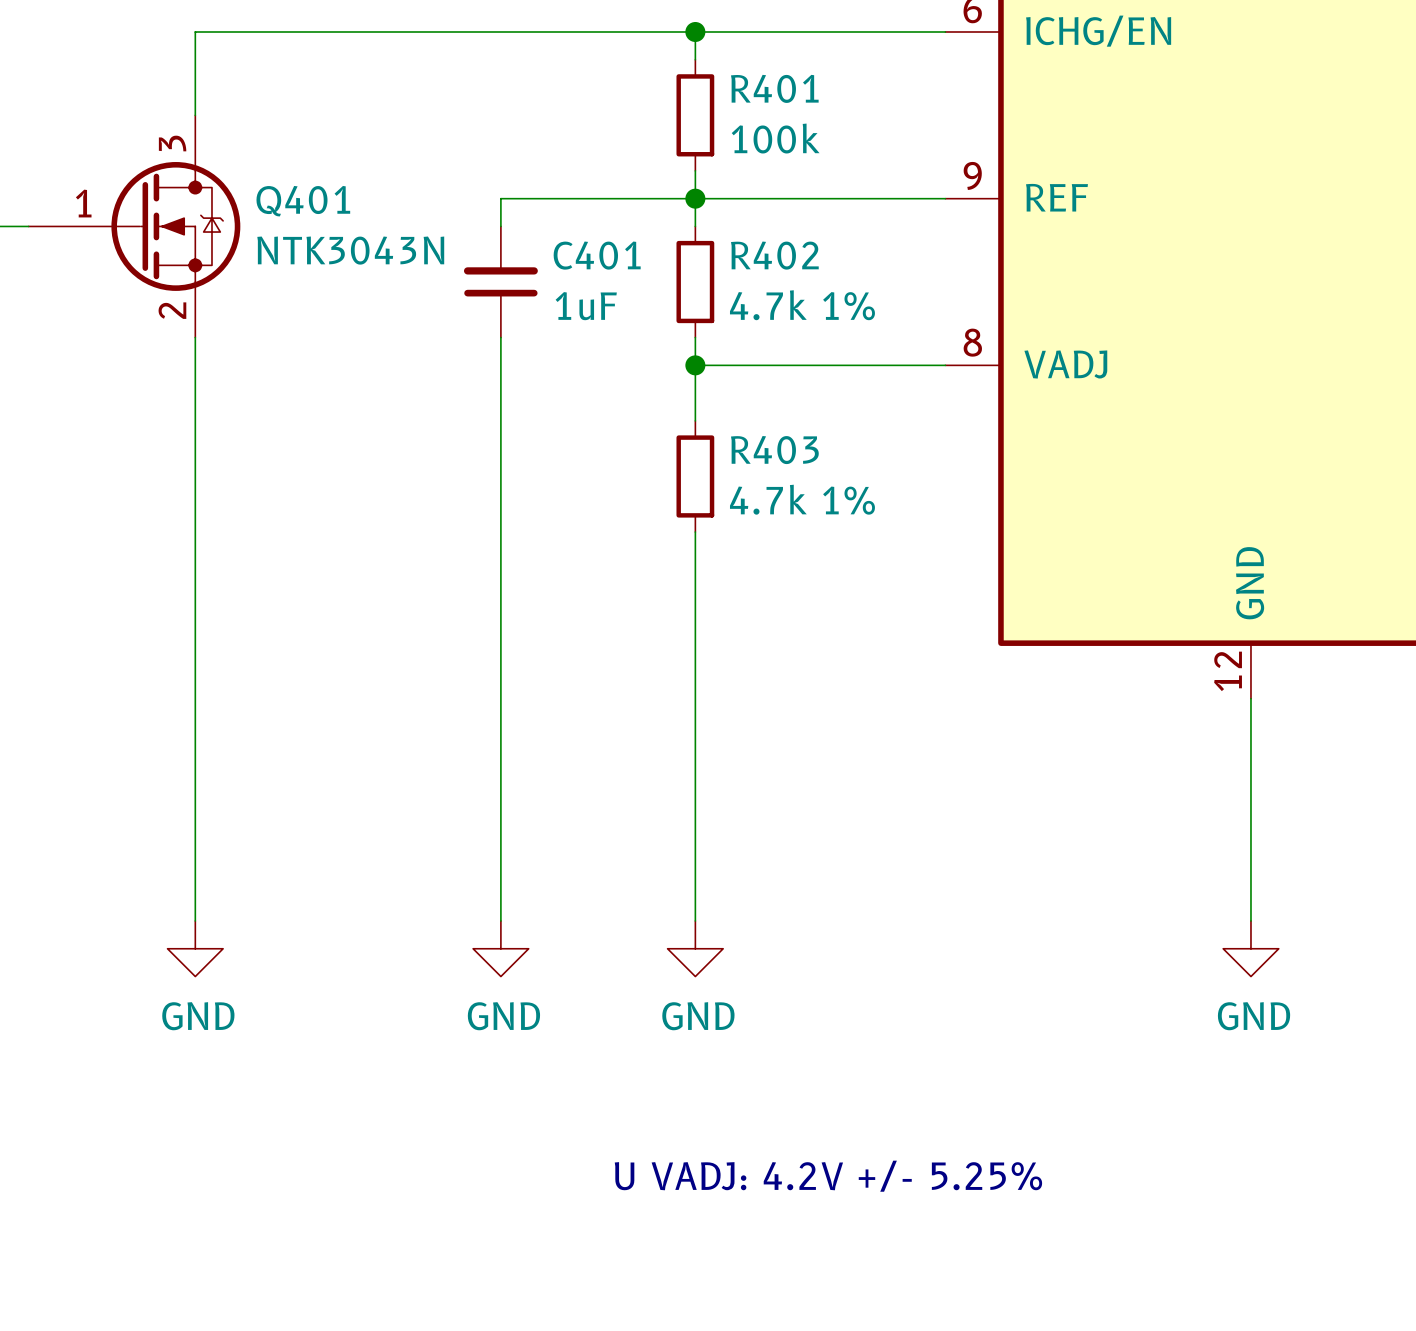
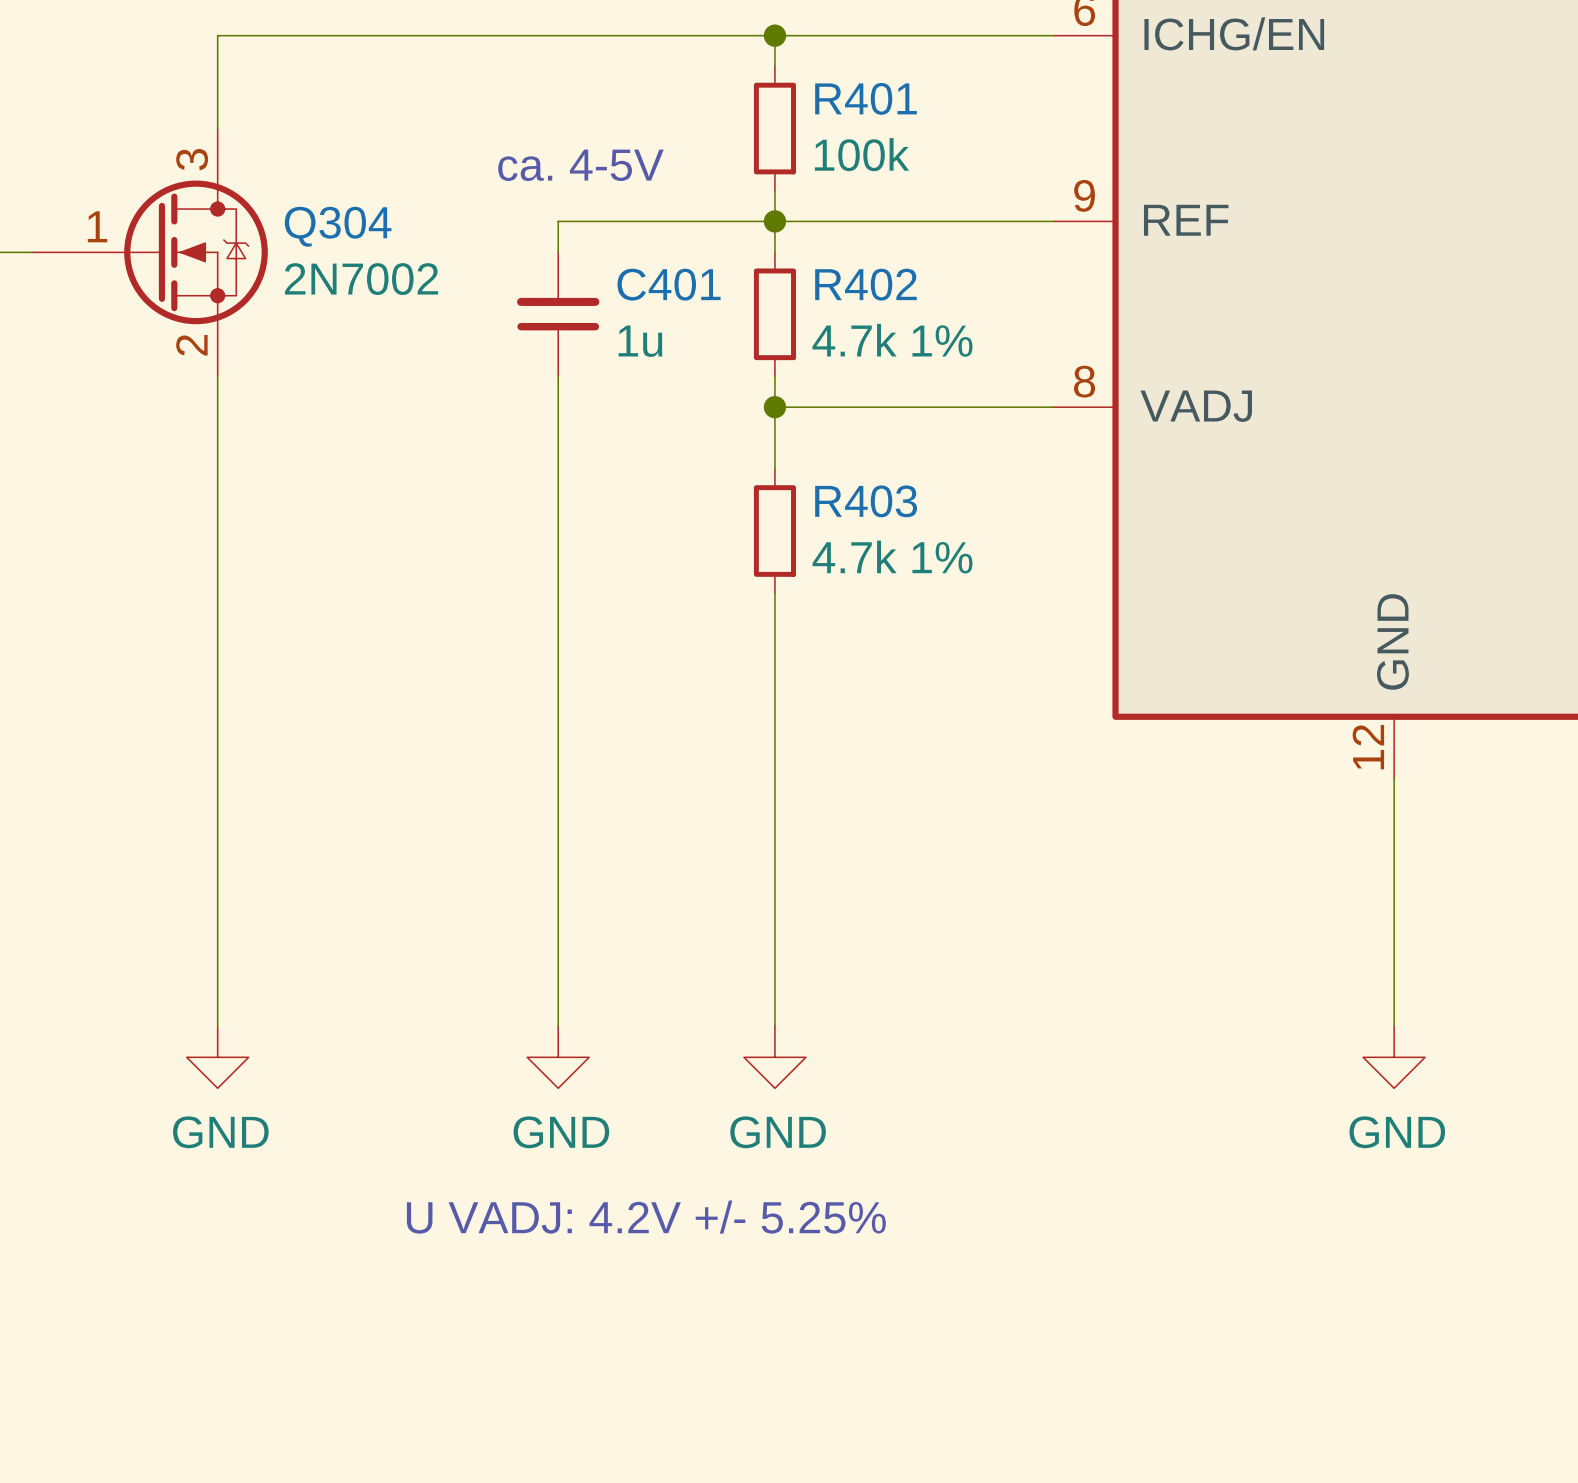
text: none -> ca. 4-5V (580, 165)
Q401: NTK3043N (134, 226) -> none
Q304: none -> 2N7002 (149, 252)
C401 value: 1uF (586, 306) -> 1u (640, 341)
text position: U VADJ: 4.2V +/- 5.25% (828, 1176) -> U VADJ: 4.2V +/- 5.25% (646, 1217)

